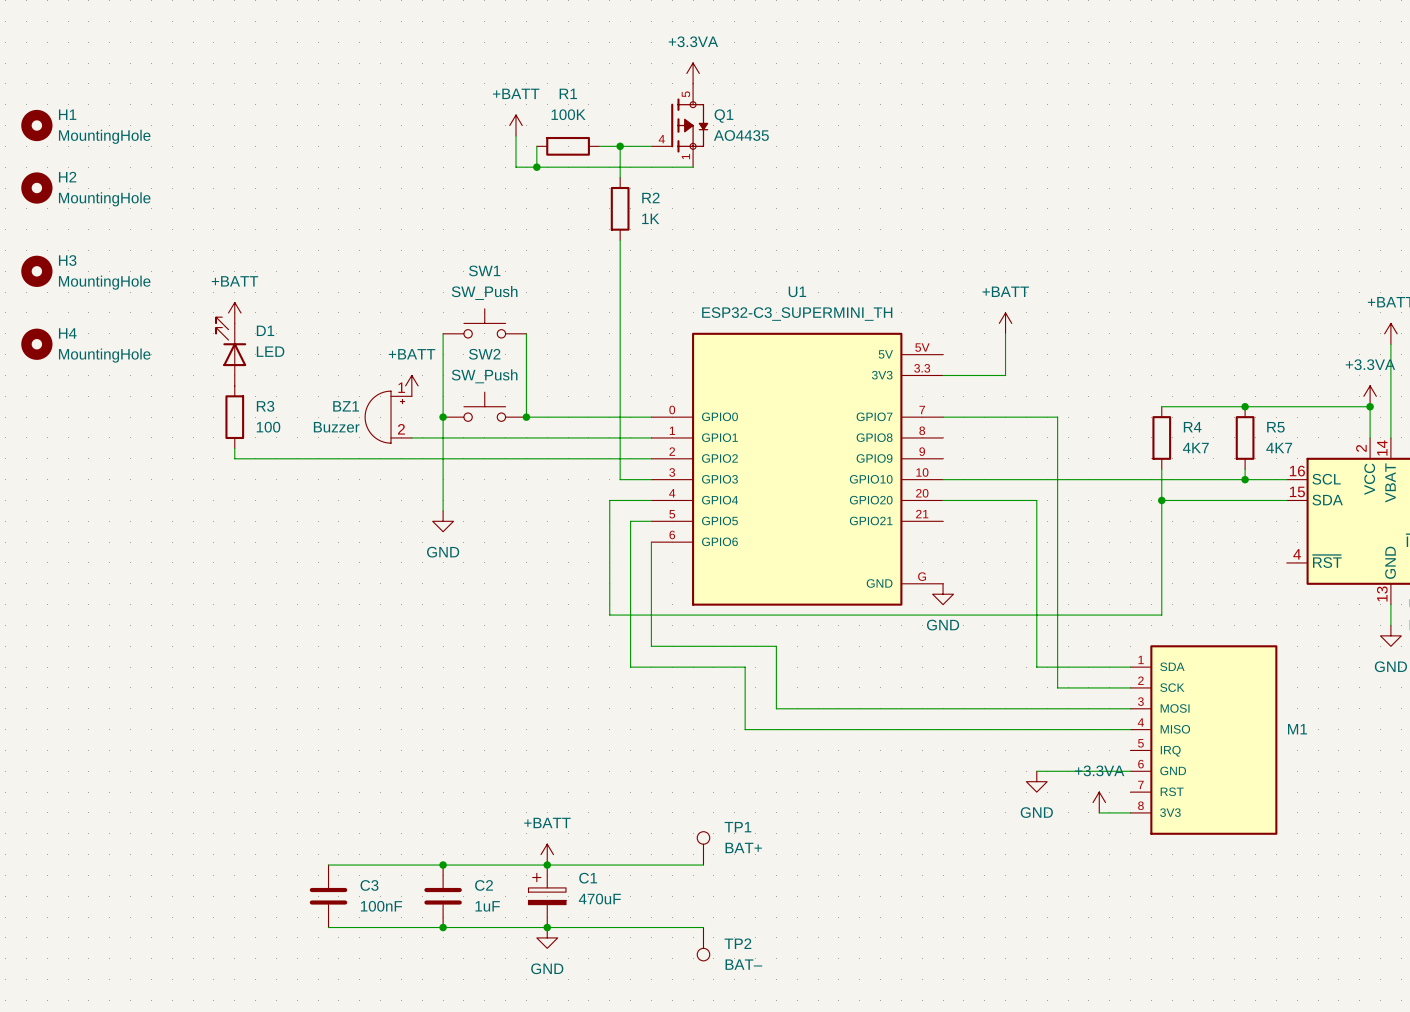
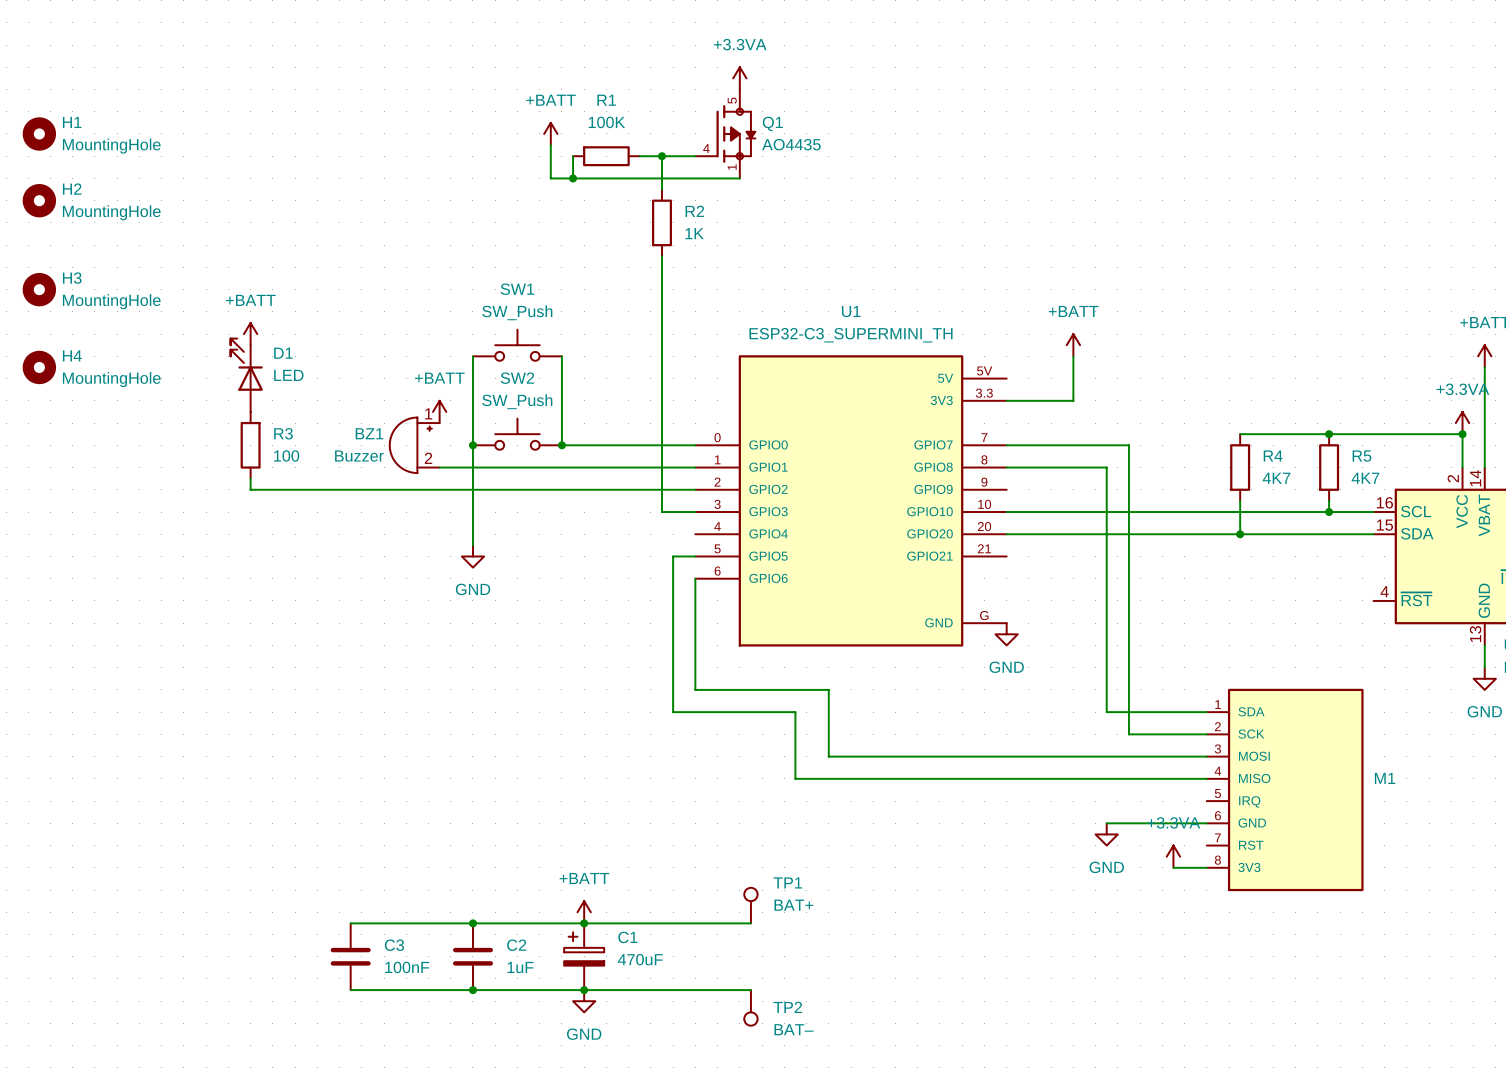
wire: (651, 500) (609, 500) (609, 615) (1161, 615) (1161, 500) -> (1006, 467) (1106, 467) (1106, 534) (1240, 534)

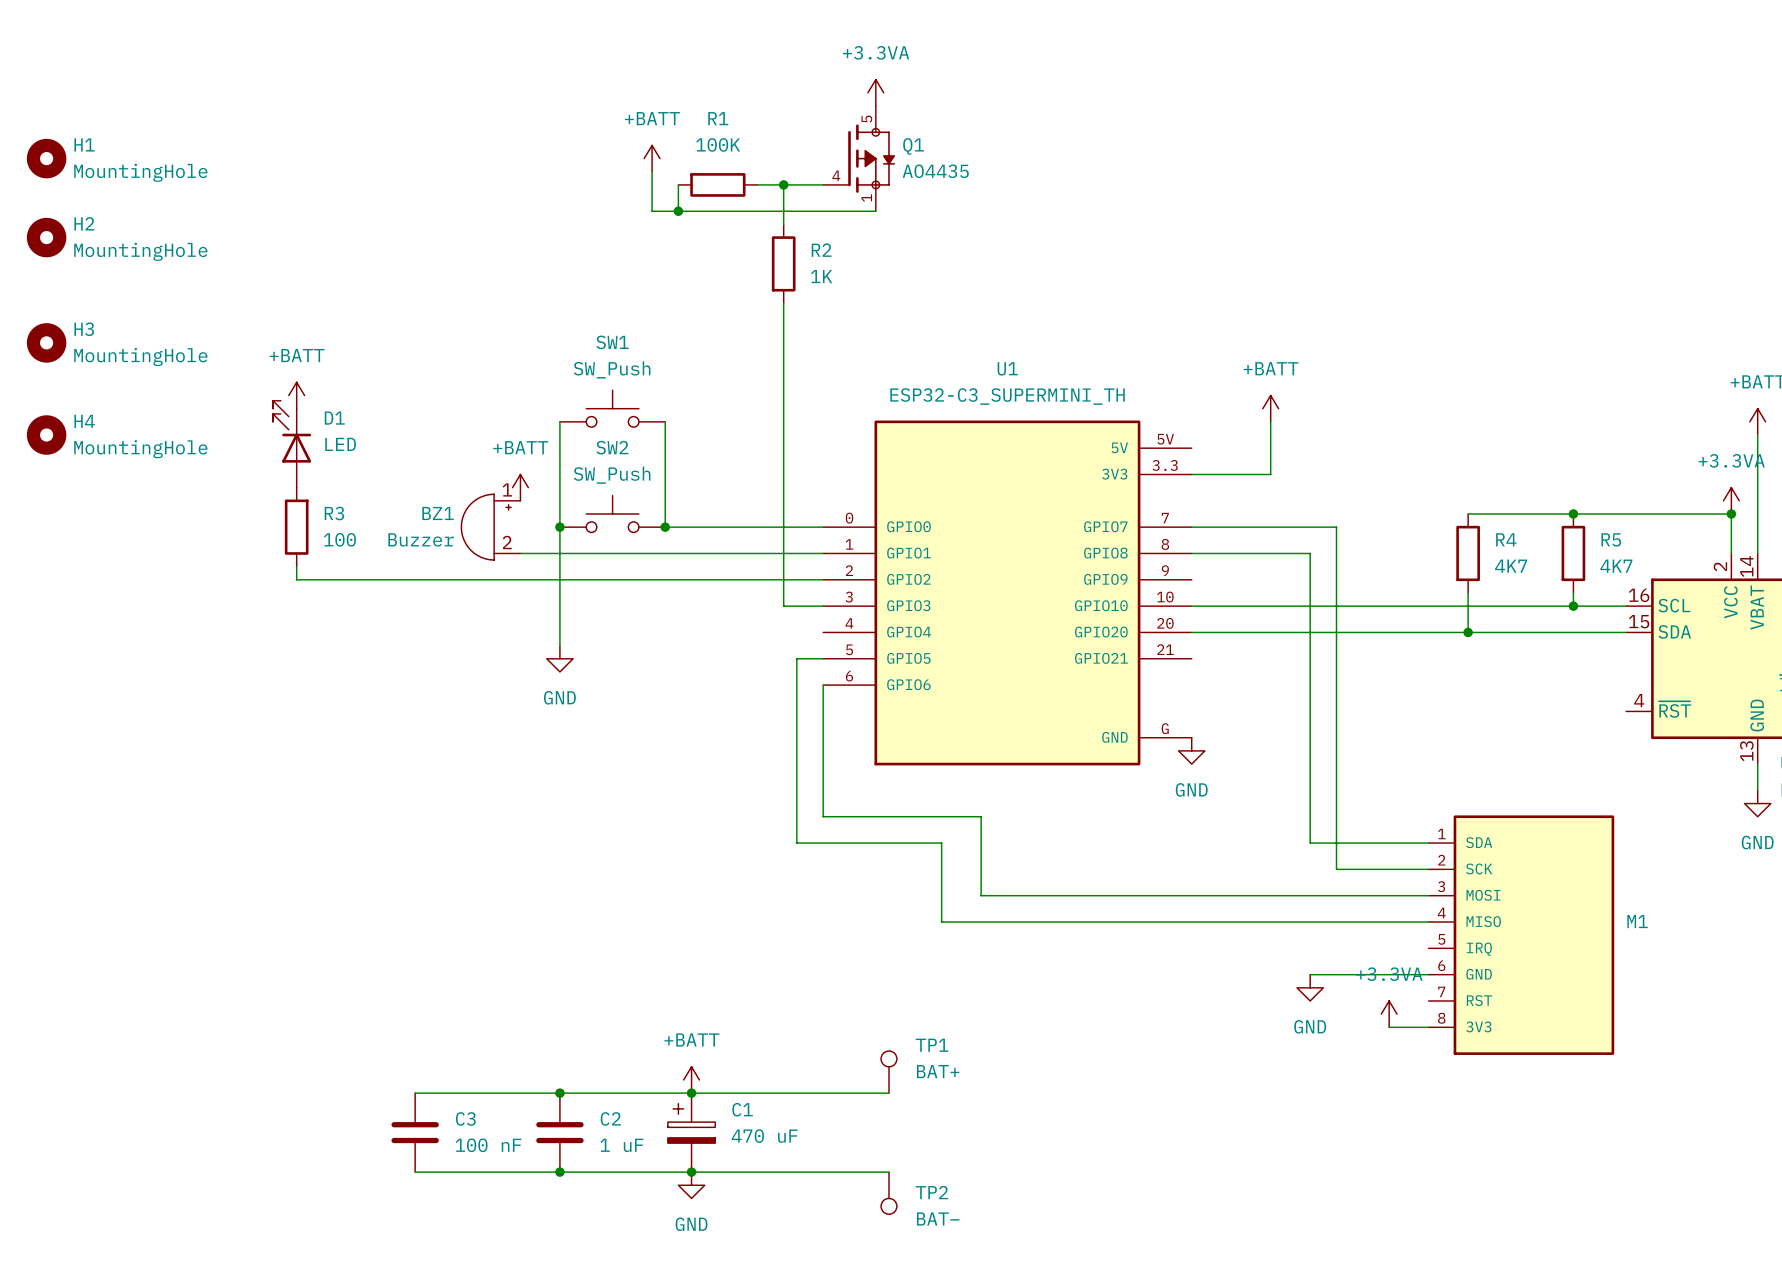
C1 value: 470uF (640, 959) -> 470 uF (764, 1136)
C3 value: 100nF (407, 967) -> 100 nF (488, 1145)
C2 value: 1uF (520, 967) -> 1 uF (621, 1145)

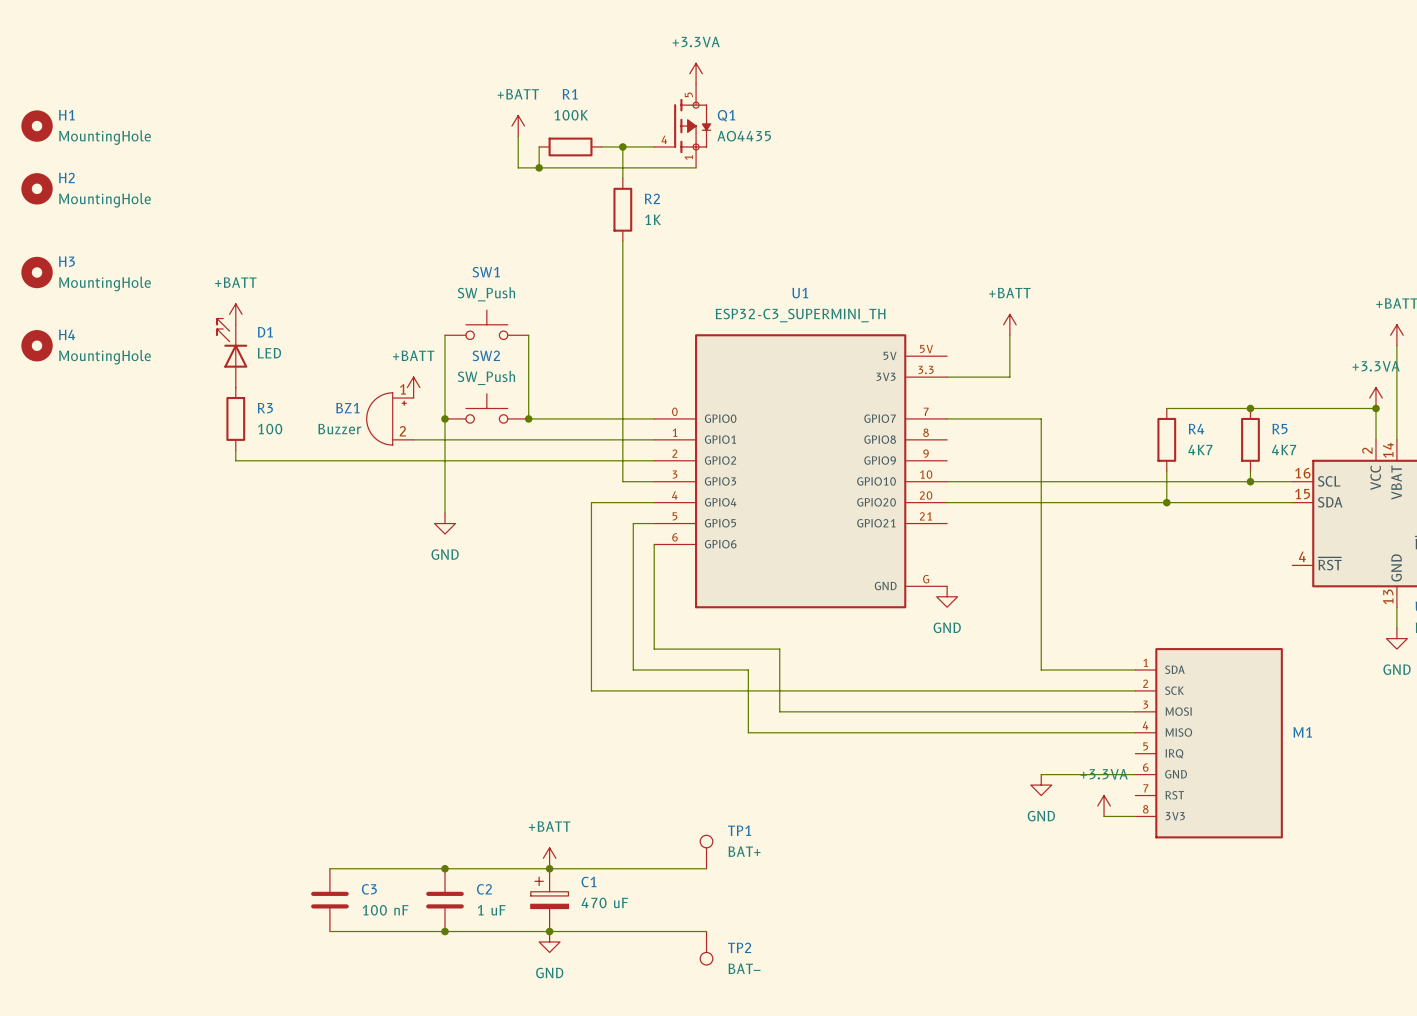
wire: (1310, 527) (1336, 527) (1336, 869) -> (654, 502) (591, 502) (591, 690) (1062, 690)
wire: (1191, 553) (1310, 553) -> (1041, 418) (1041, 439)

